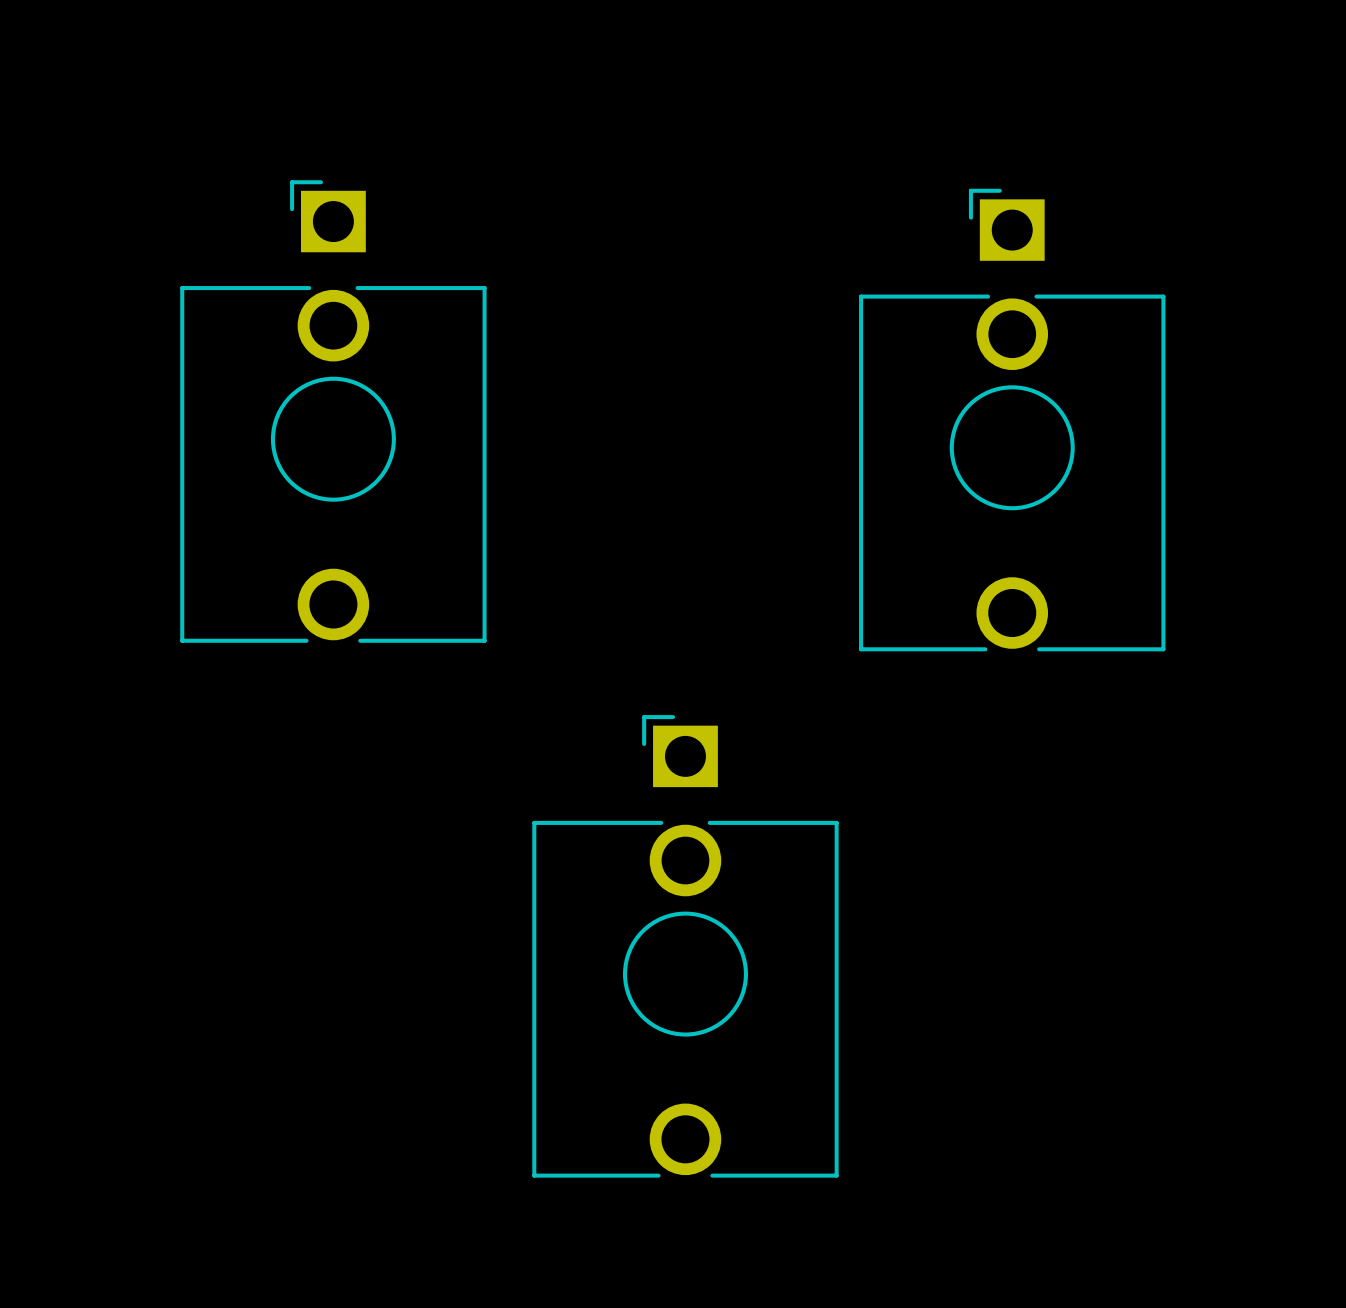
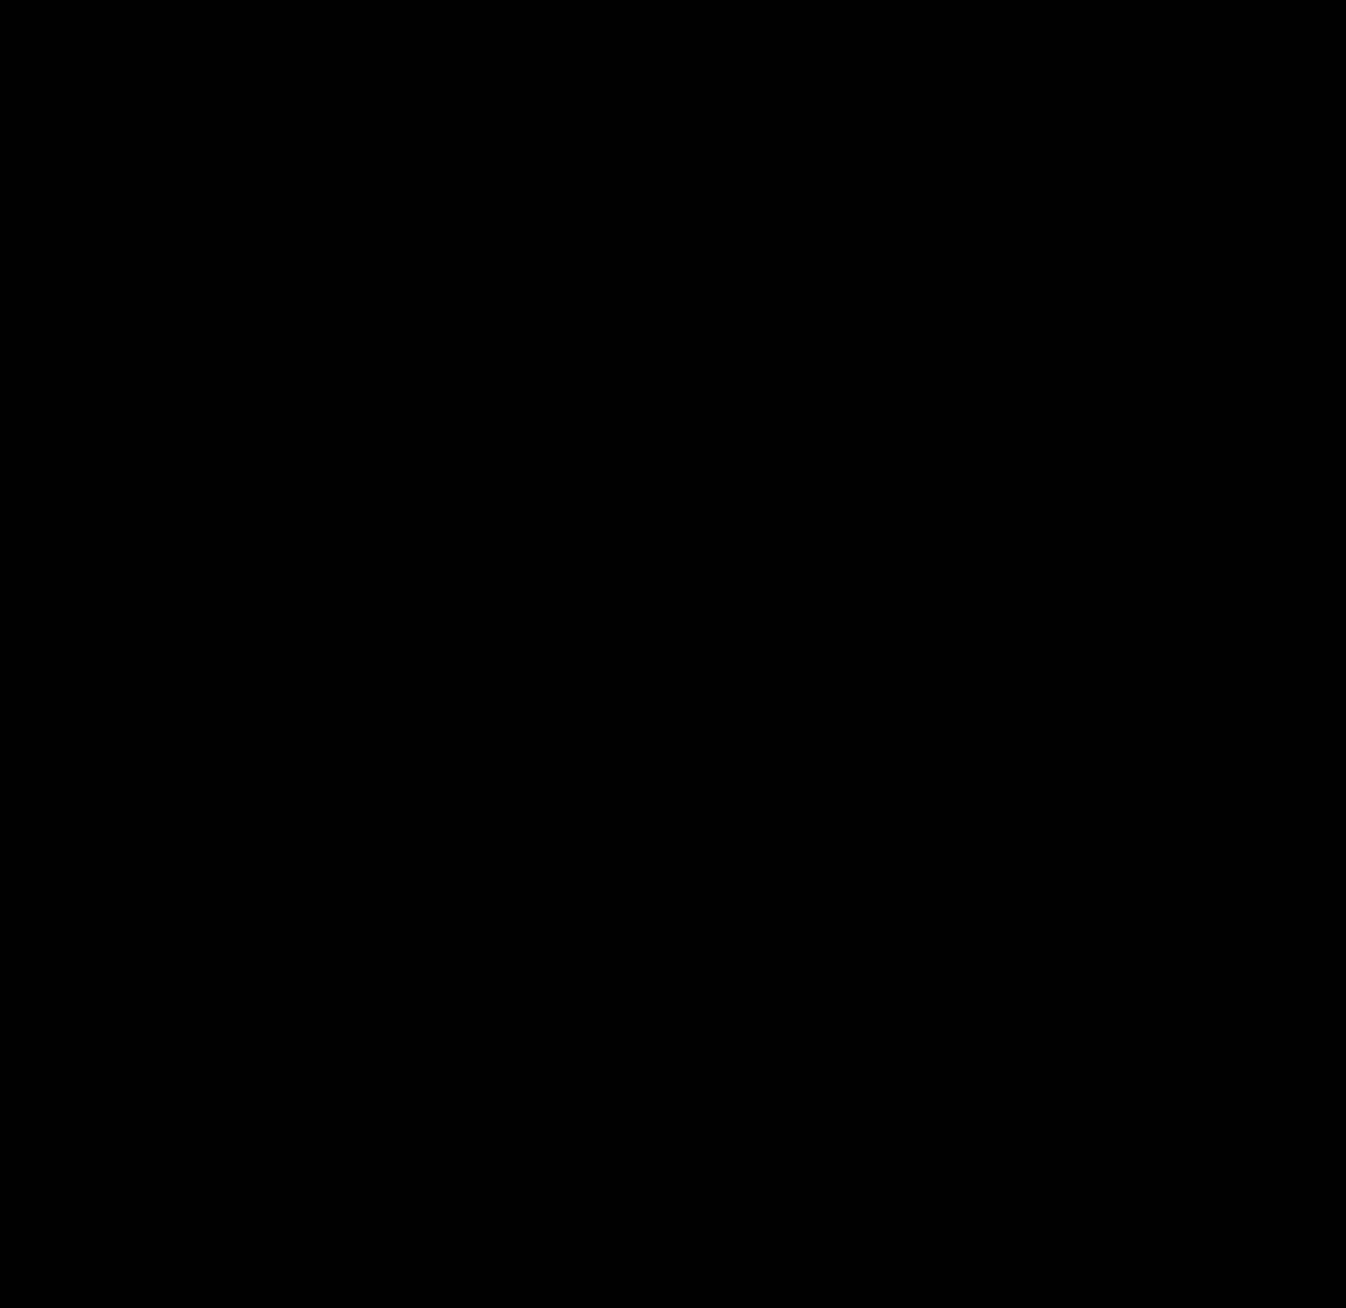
part: (333, 411) -> none
part: (1012, 420) -> none
part: (685, 946) -> none

